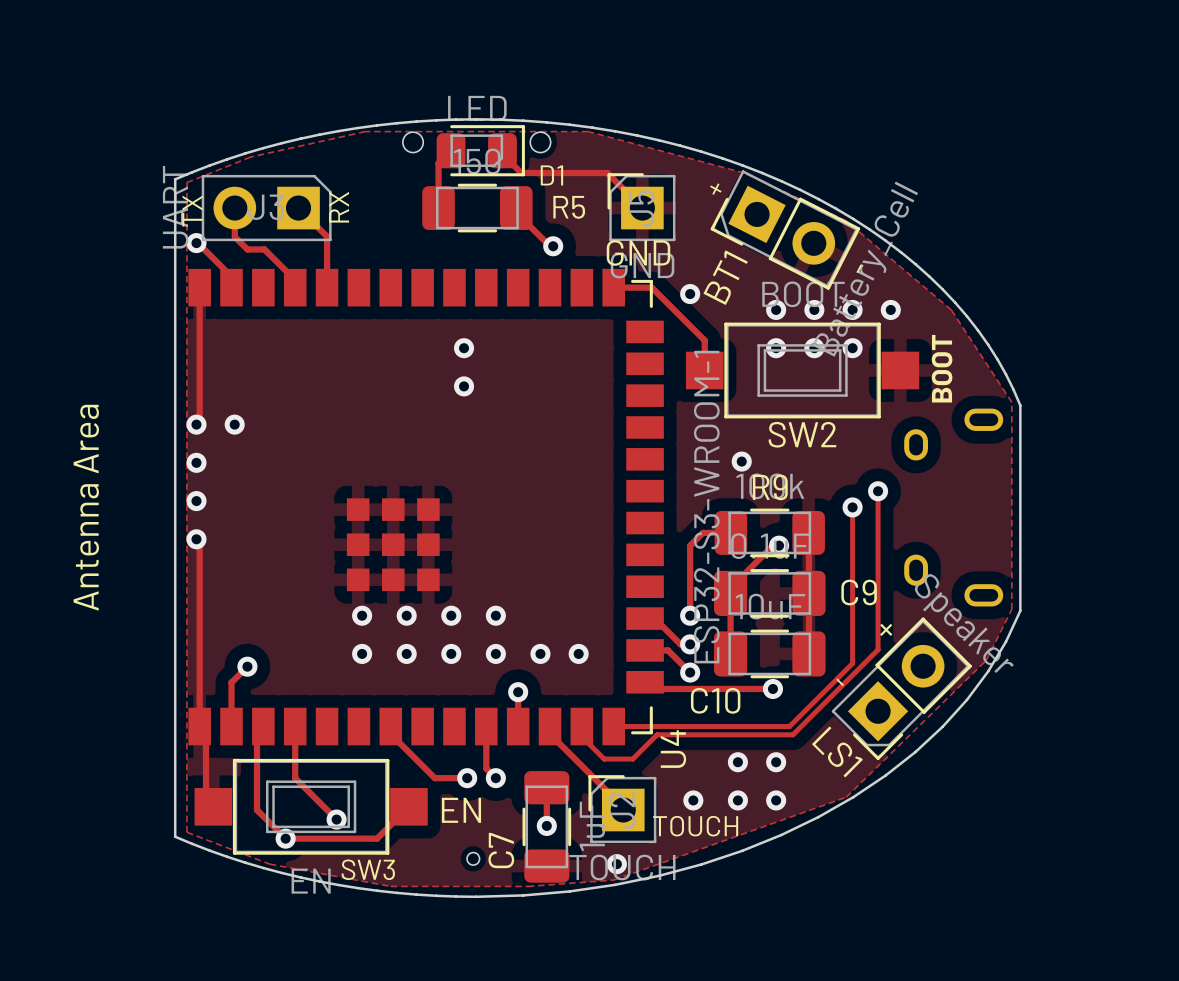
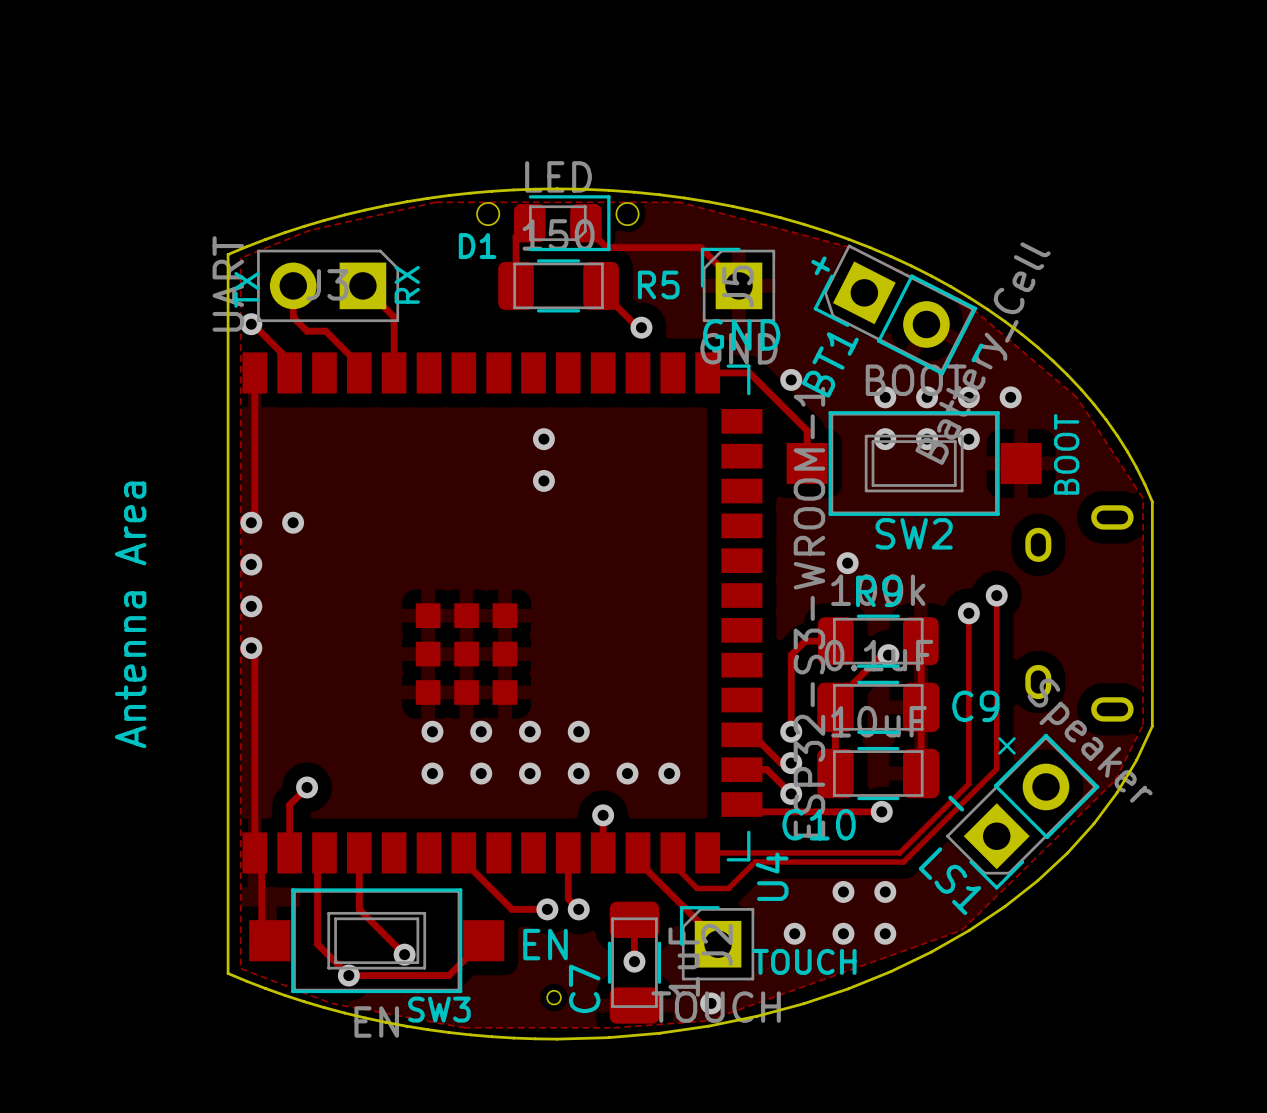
D1 name position: D1 (551, 175) -> D1 (477, 246)

